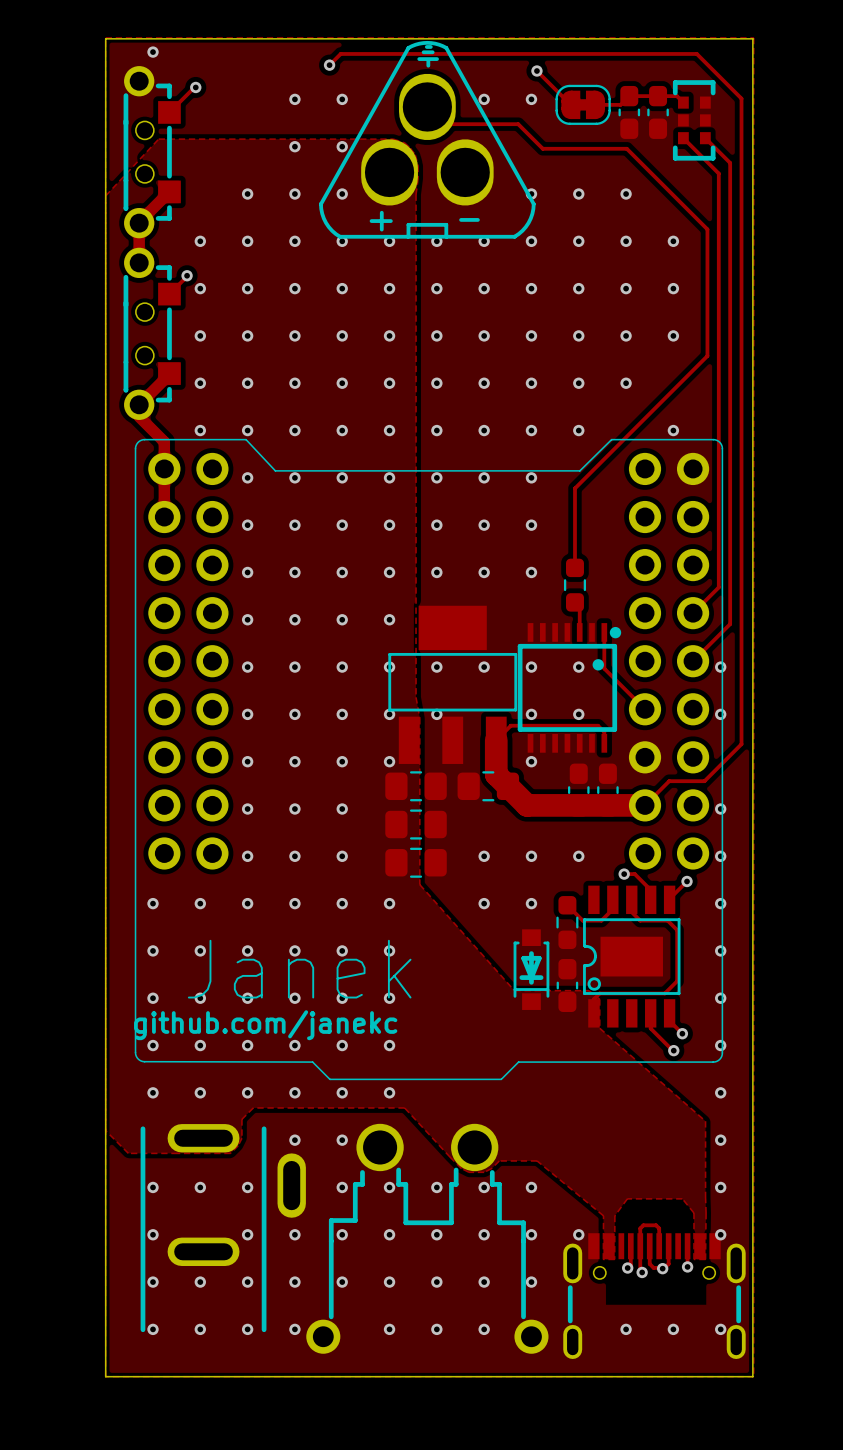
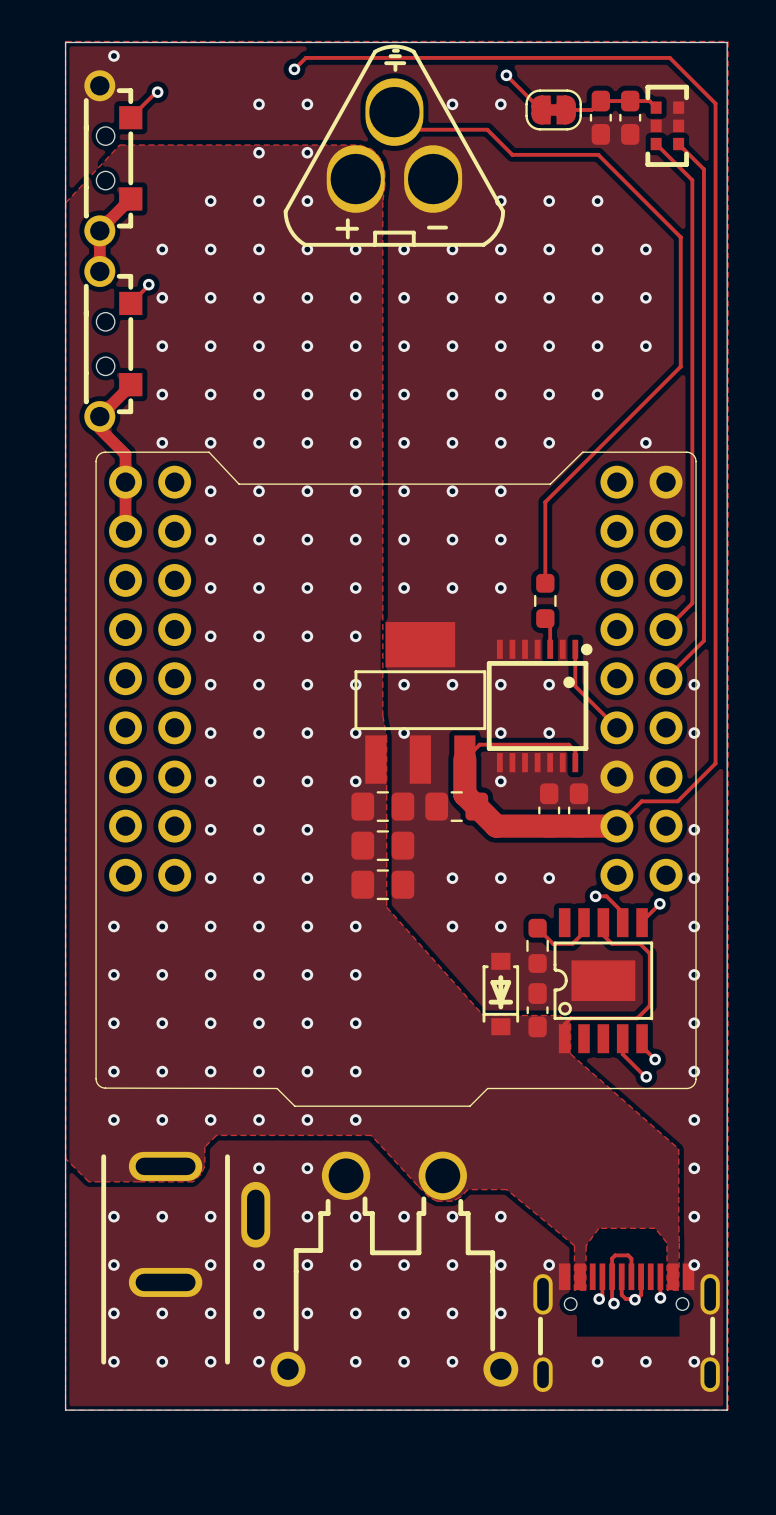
text: Janek (299, 969) -> none
text: github.com/janekc (265, 1025) -> none

